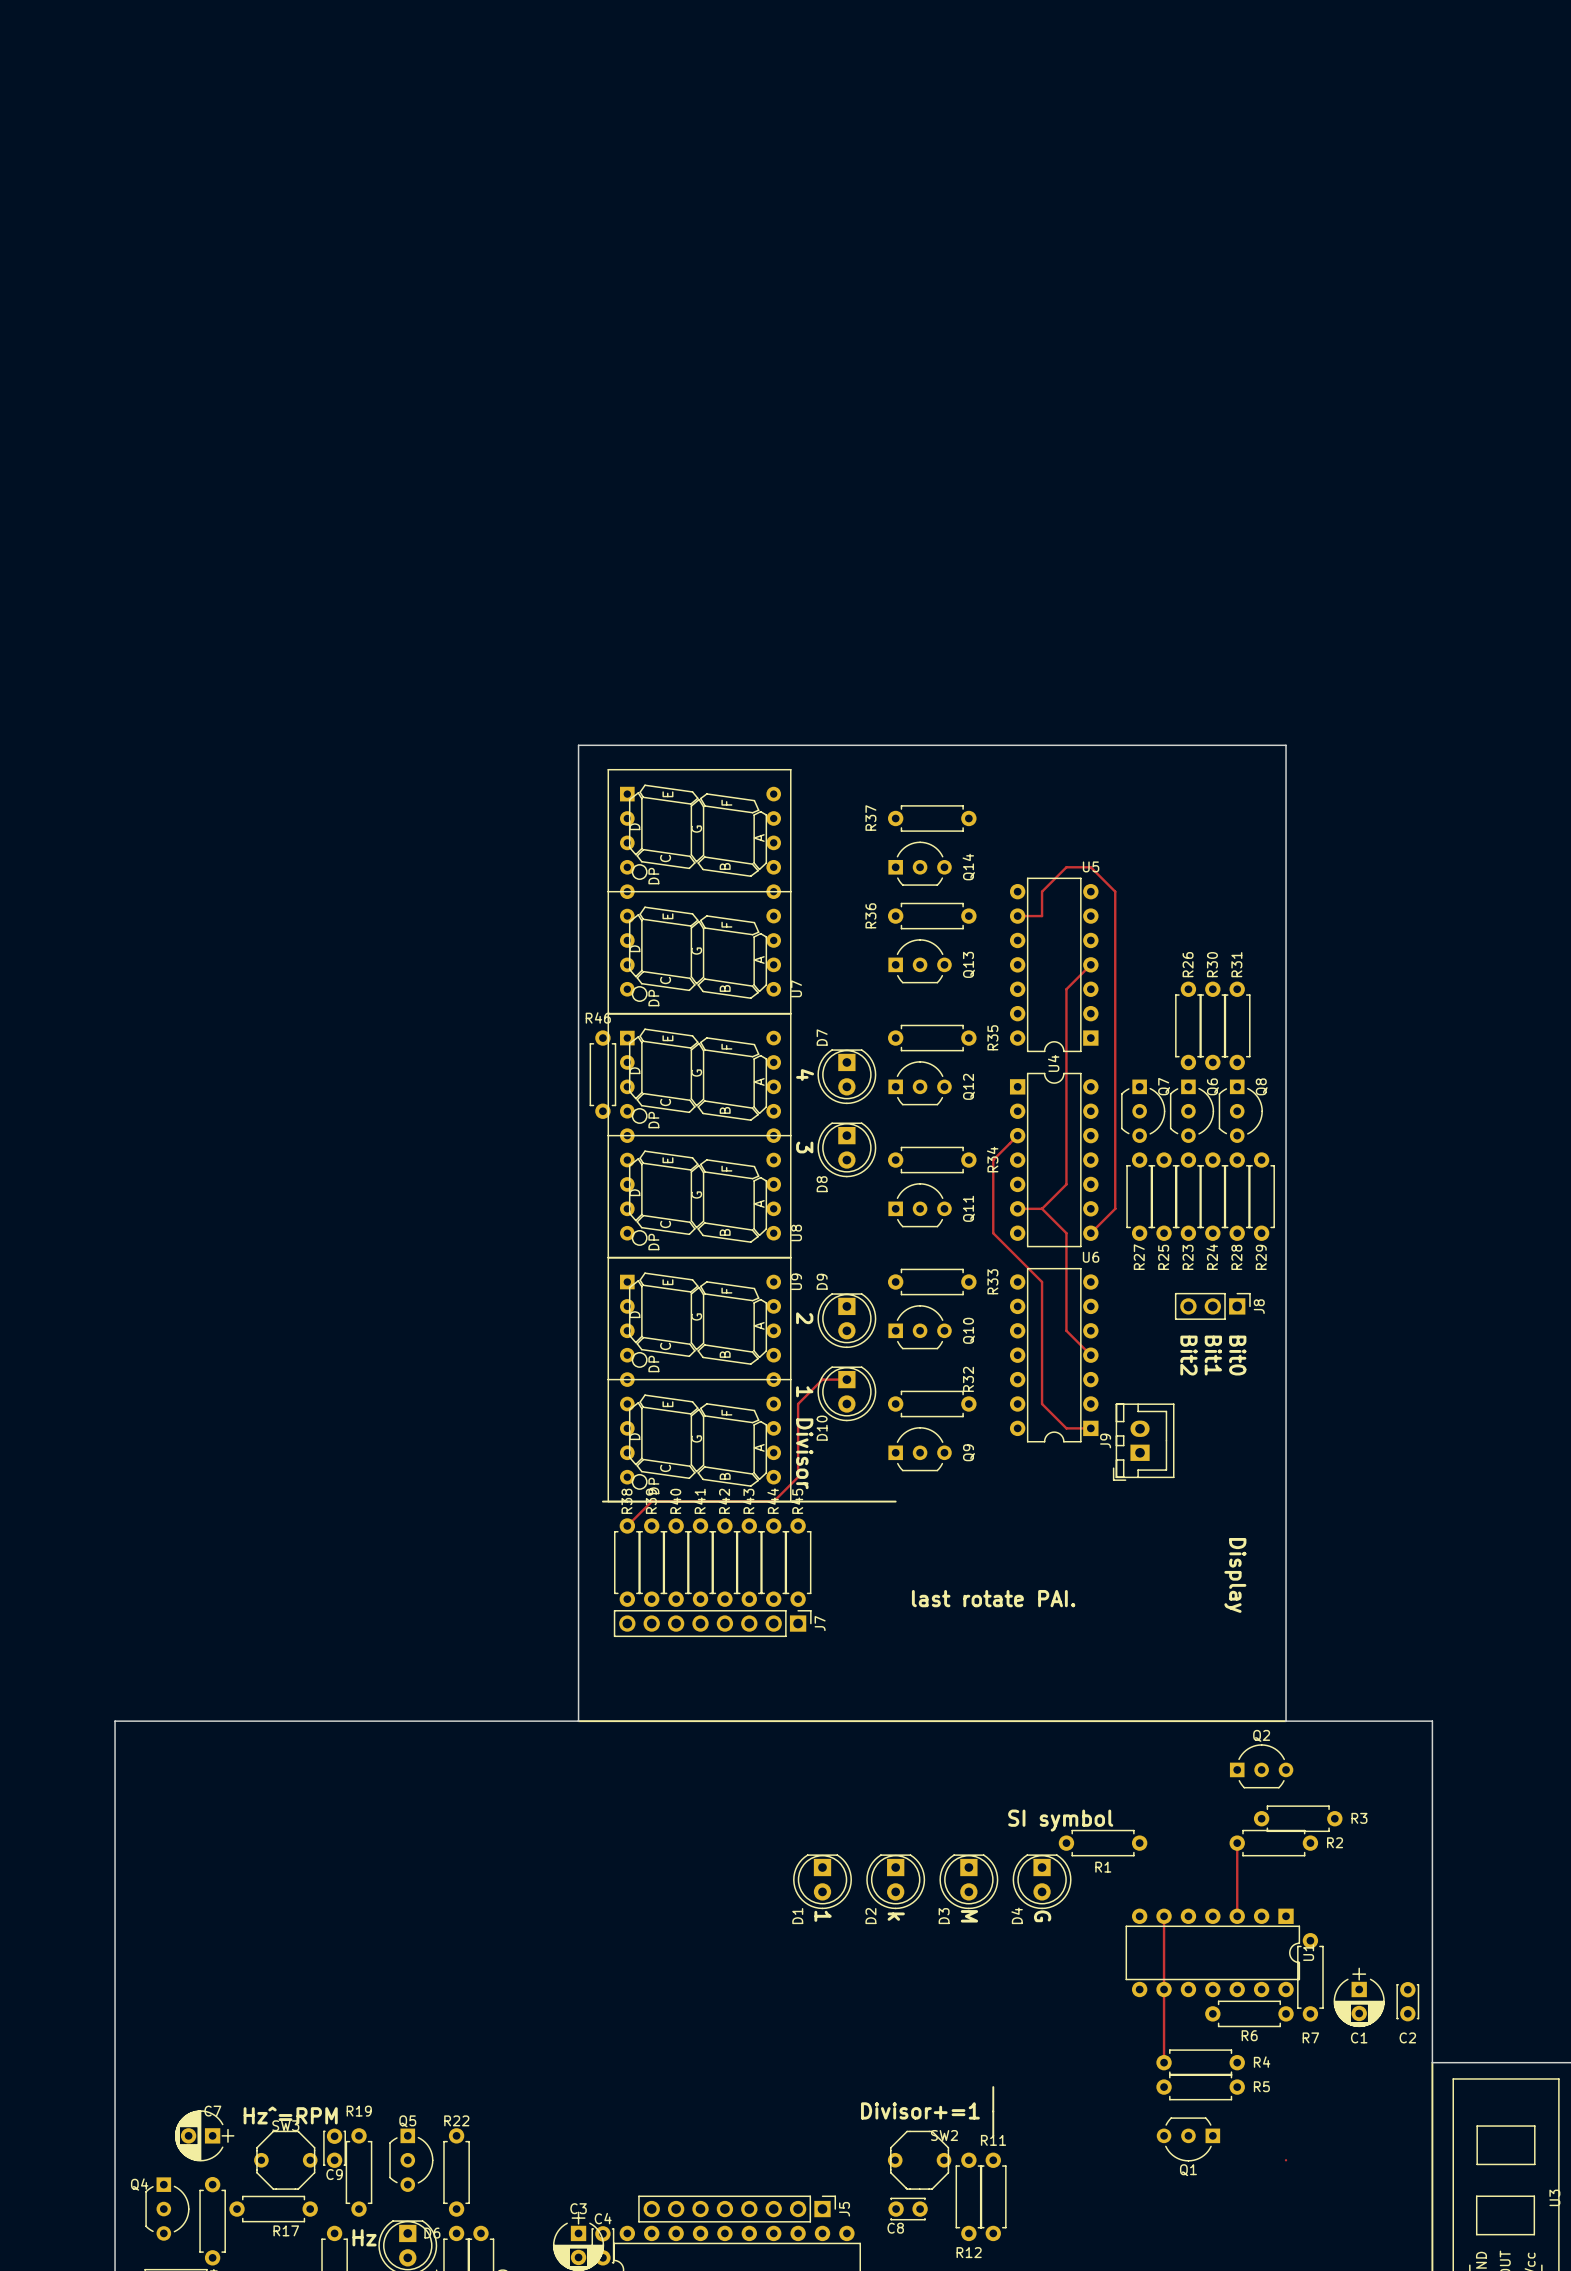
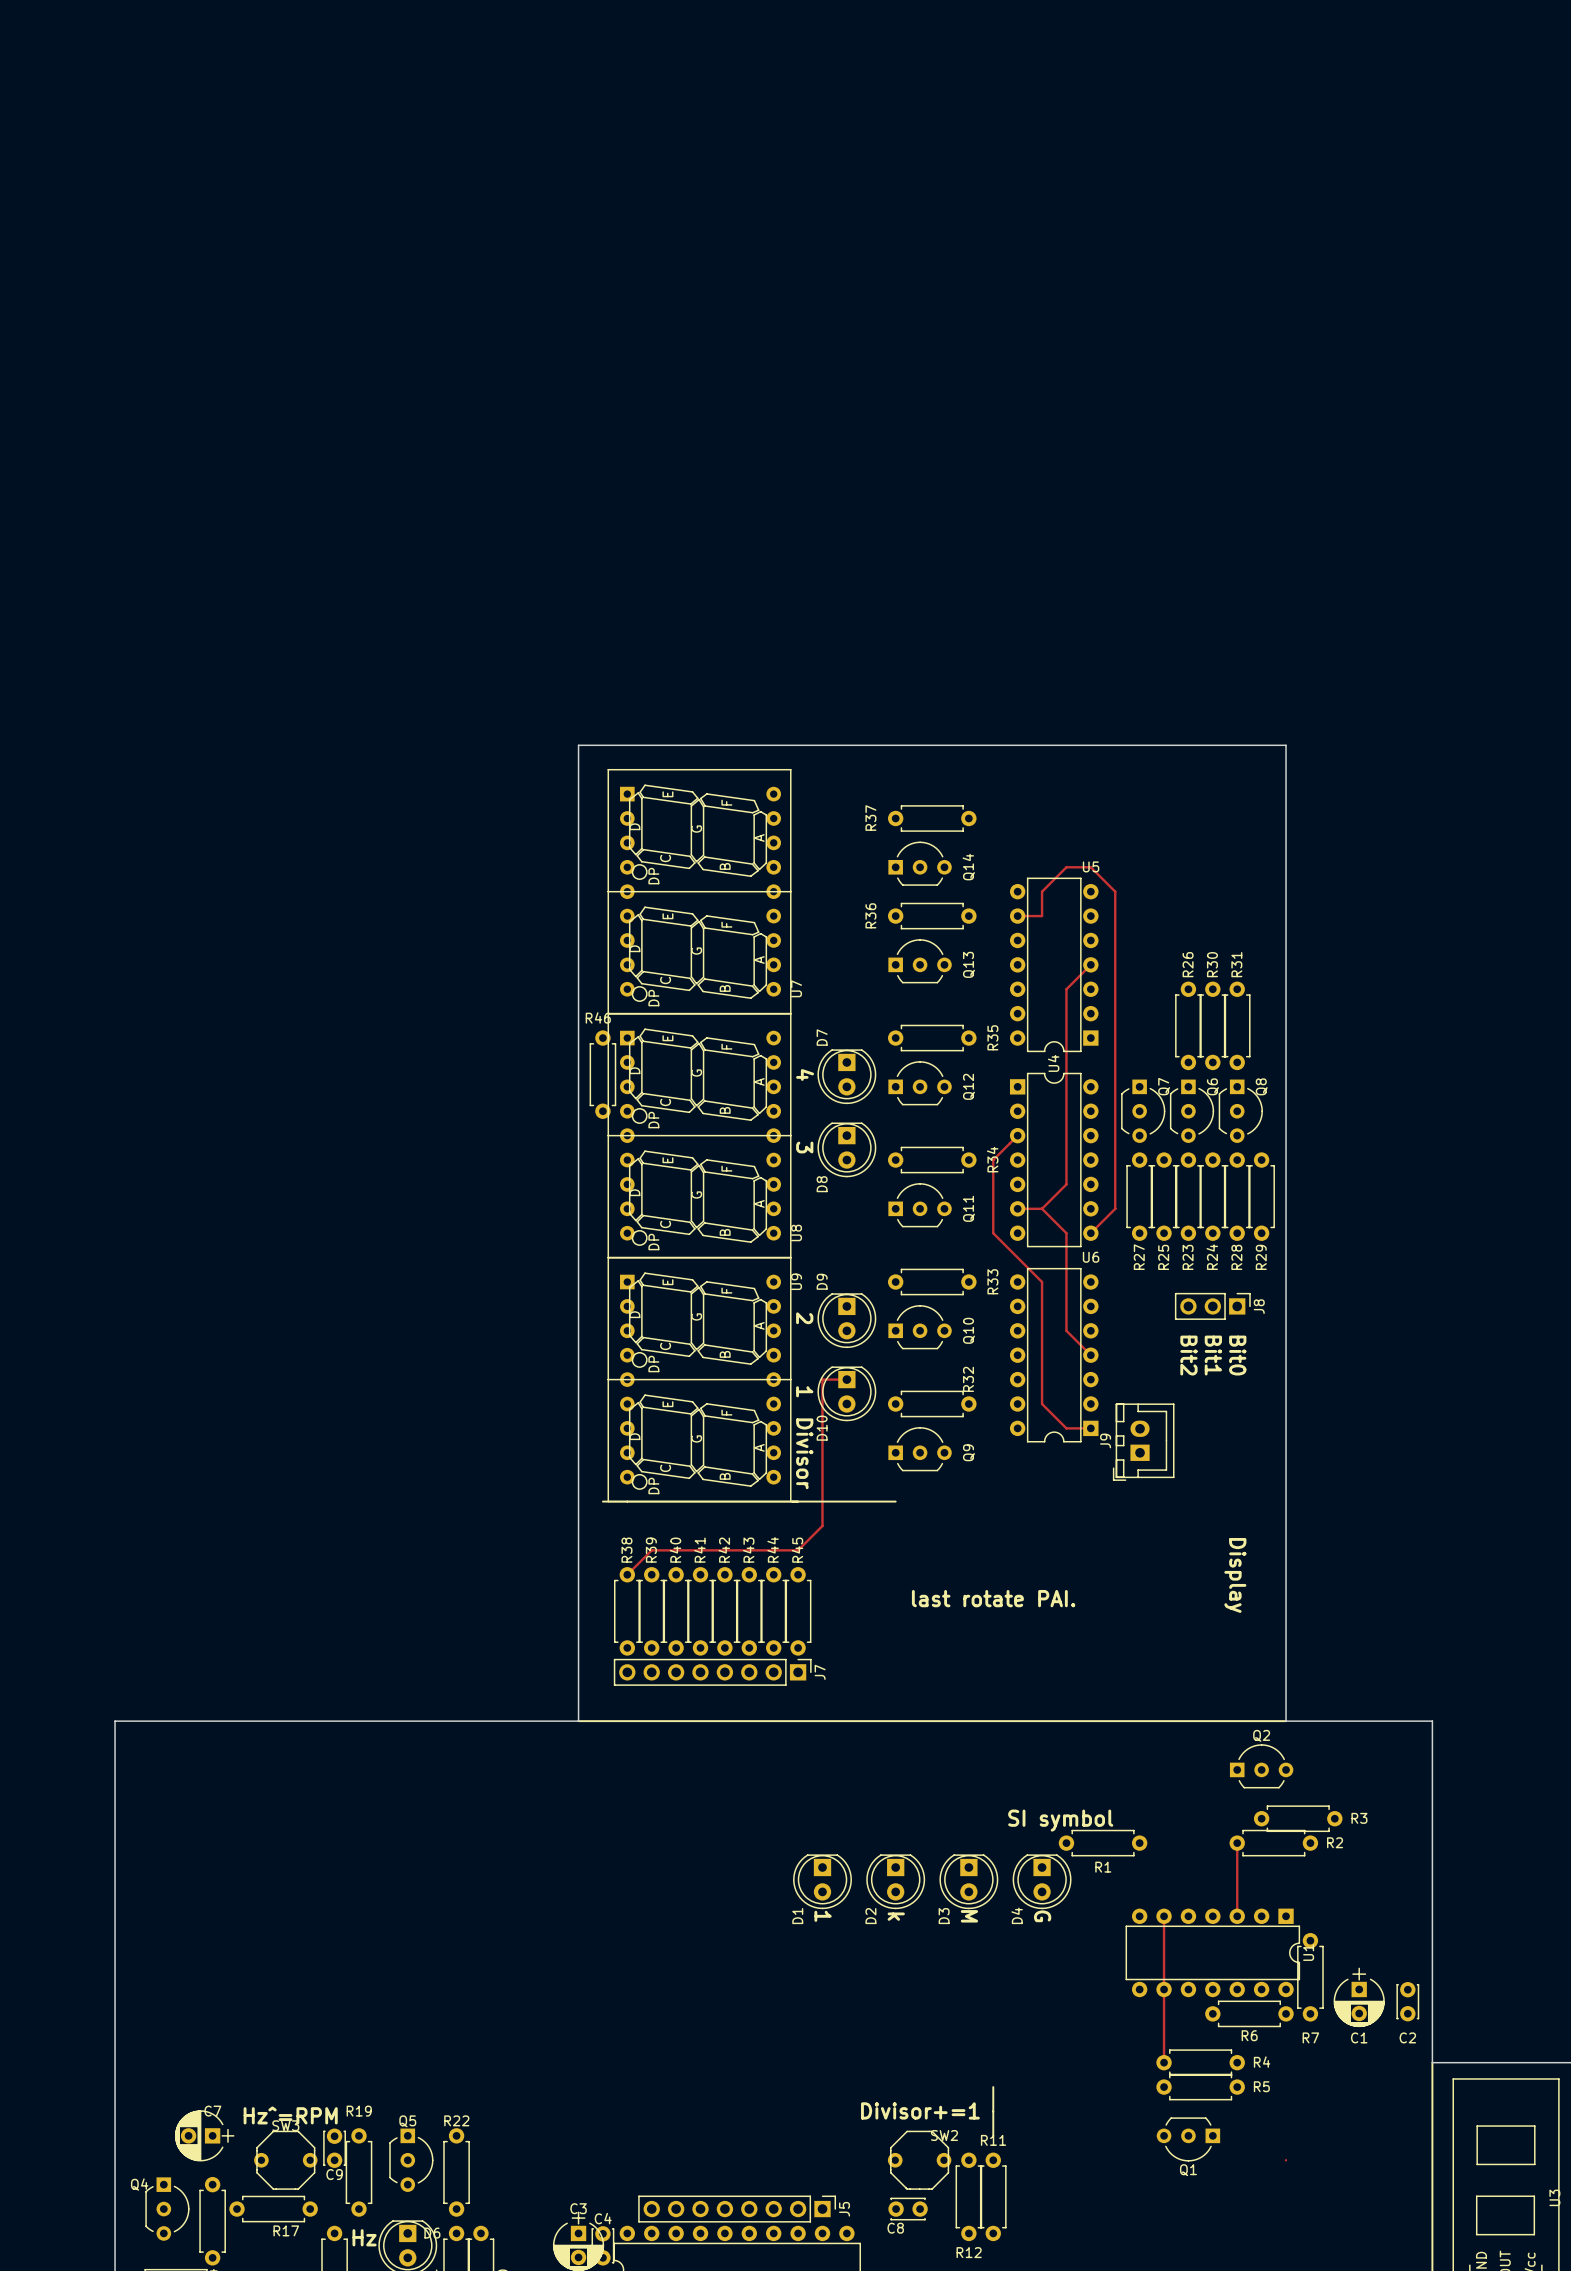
track: (822, 1379) (798, 1403) (798, 1477) (773, 1501) (651, 1501) (627, 1525) -> (822, 1379) (822, 1525) (798, 1550) (651, 1550) (627, 1574)
R38 position: (627, 1562) -> (627, 1611)
R39 position: (651, 1562) -> (651, 1611)
R40 position: (676, 1562) -> (676, 1611)
R41 position: (700, 1562) -> (700, 1611)
R42 position: (724, 1562) -> (724, 1611)
R43 position: (749, 1562) -> (749, 1611)
R44 position: (773, 1562) -> (773, 1611)
R45 position: (798, 1562) -> (798, 1611)
J7 position: (712, 1623) -> (712, 1672)

